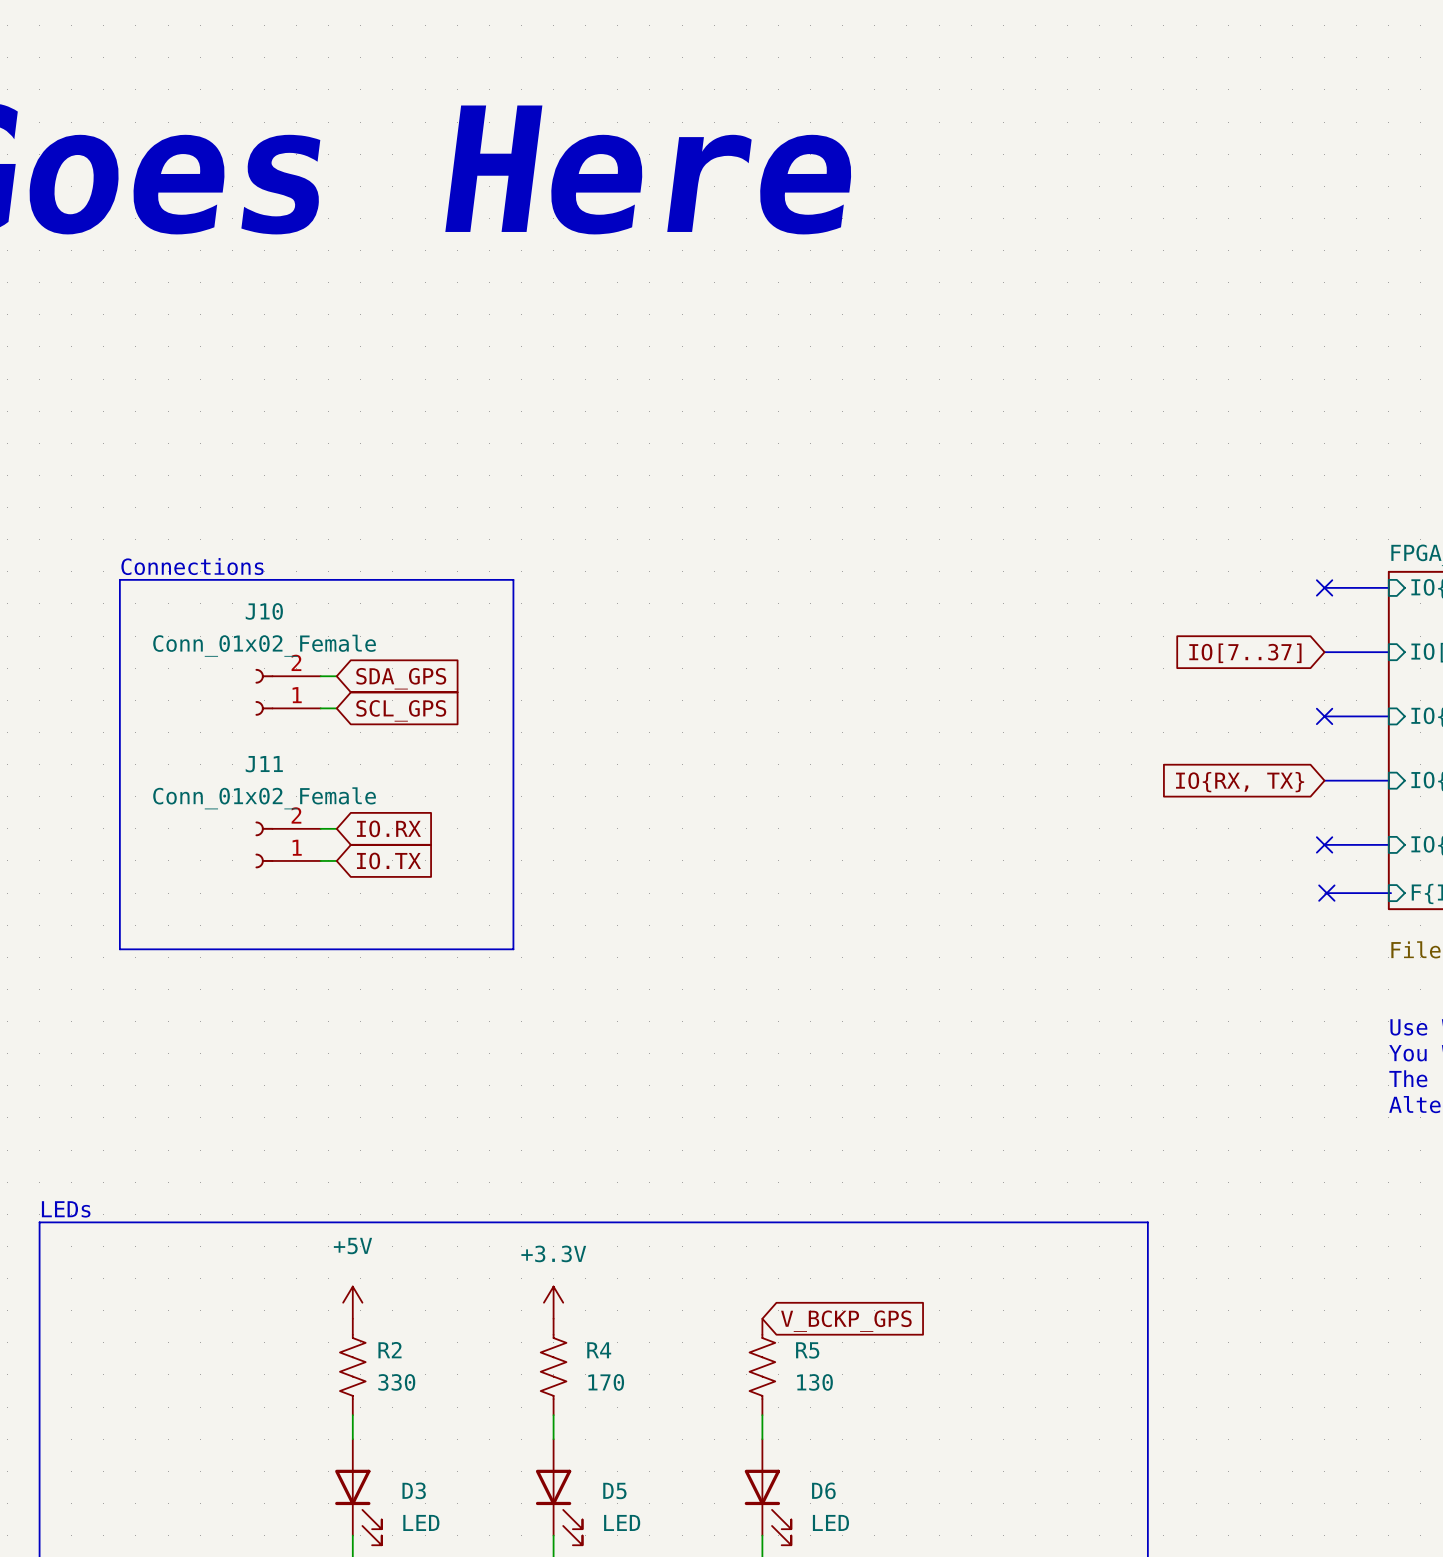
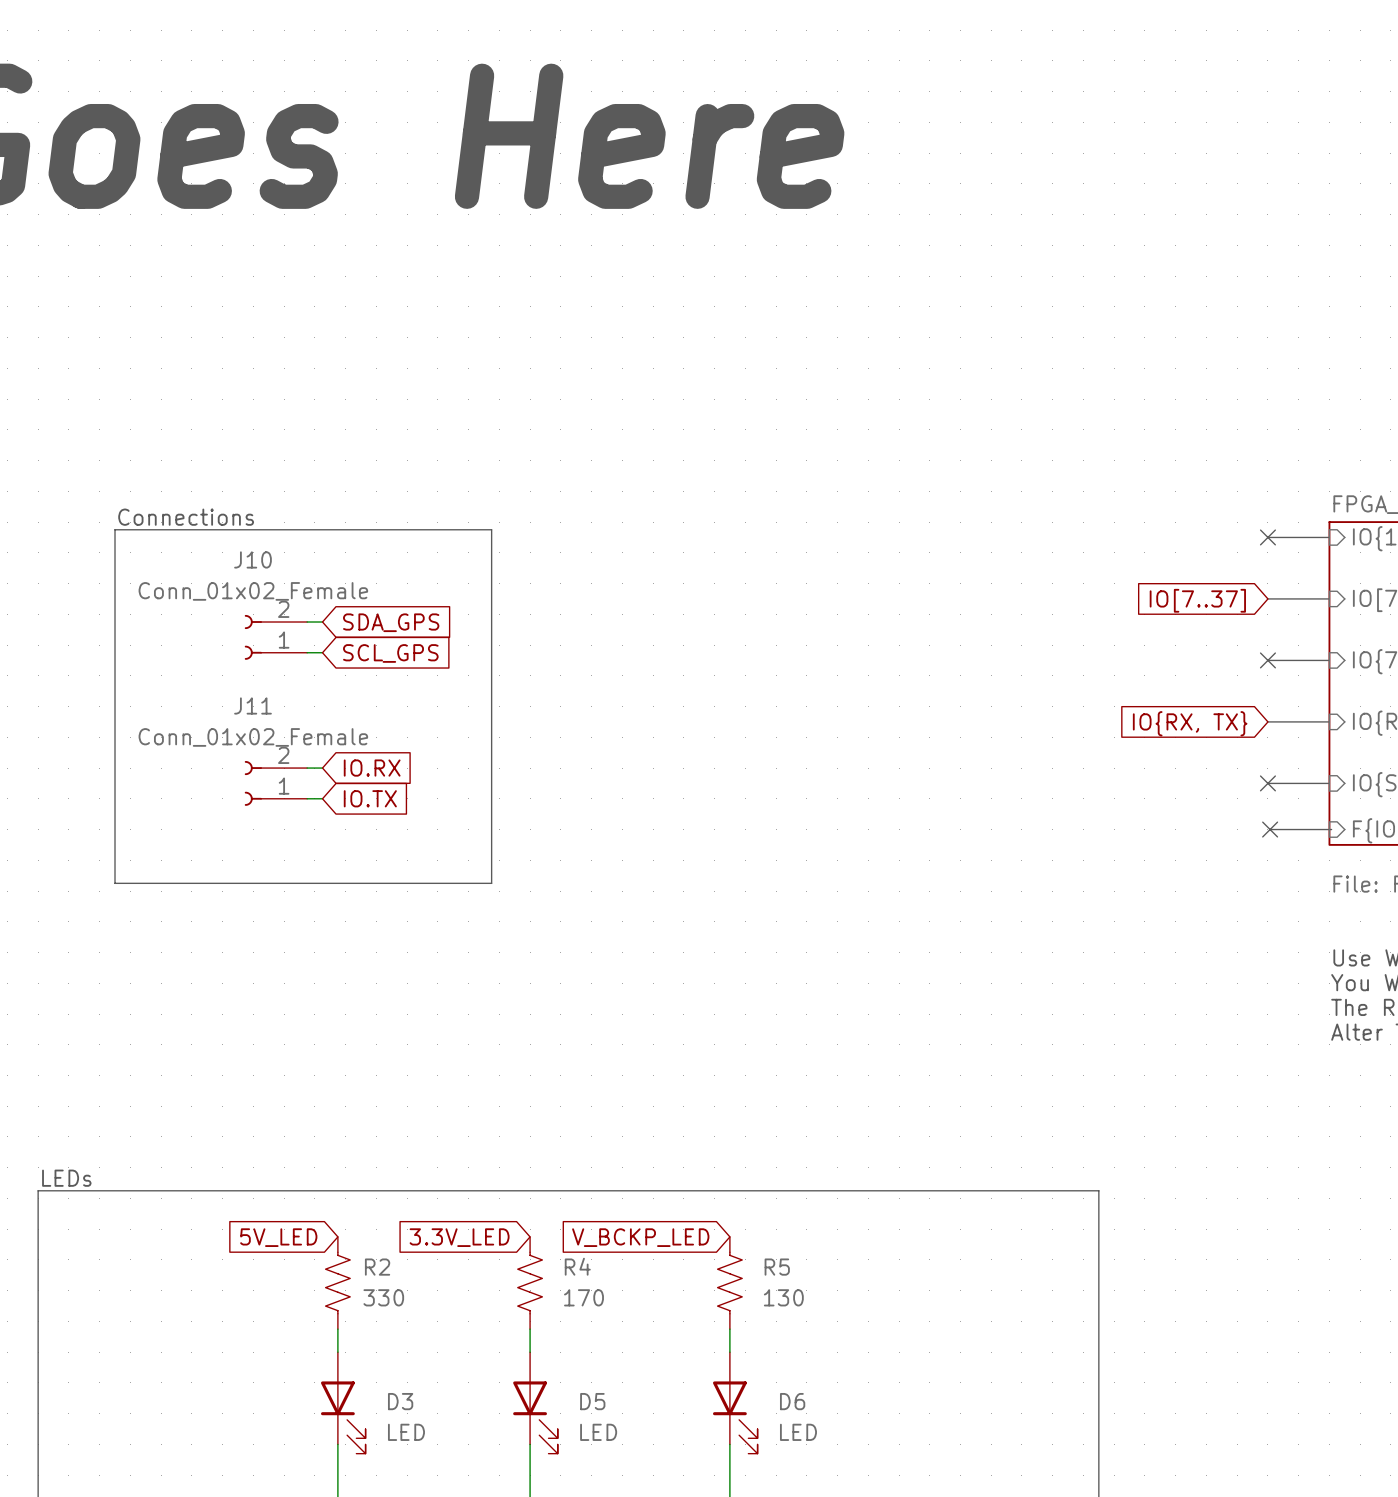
text position: LEDs (66, 1209) -> LEDs (66, 1178)
line: (39, 1270) (39, 1222) (1147, 1222) (1147, 1270) -> (38, 1190) (1098, 1190)
power symbol: +5V (352, 1302) -> none
power symbol: +3.3V (553, 1302) -> none
global label: none -> 5V_LED (278, 1237)
global label: none -> 3.3V_LED (459, 1237)
global label: V_BCKP_GPS (846, 1321) -> V_BCKP_LED (640, 1237)

